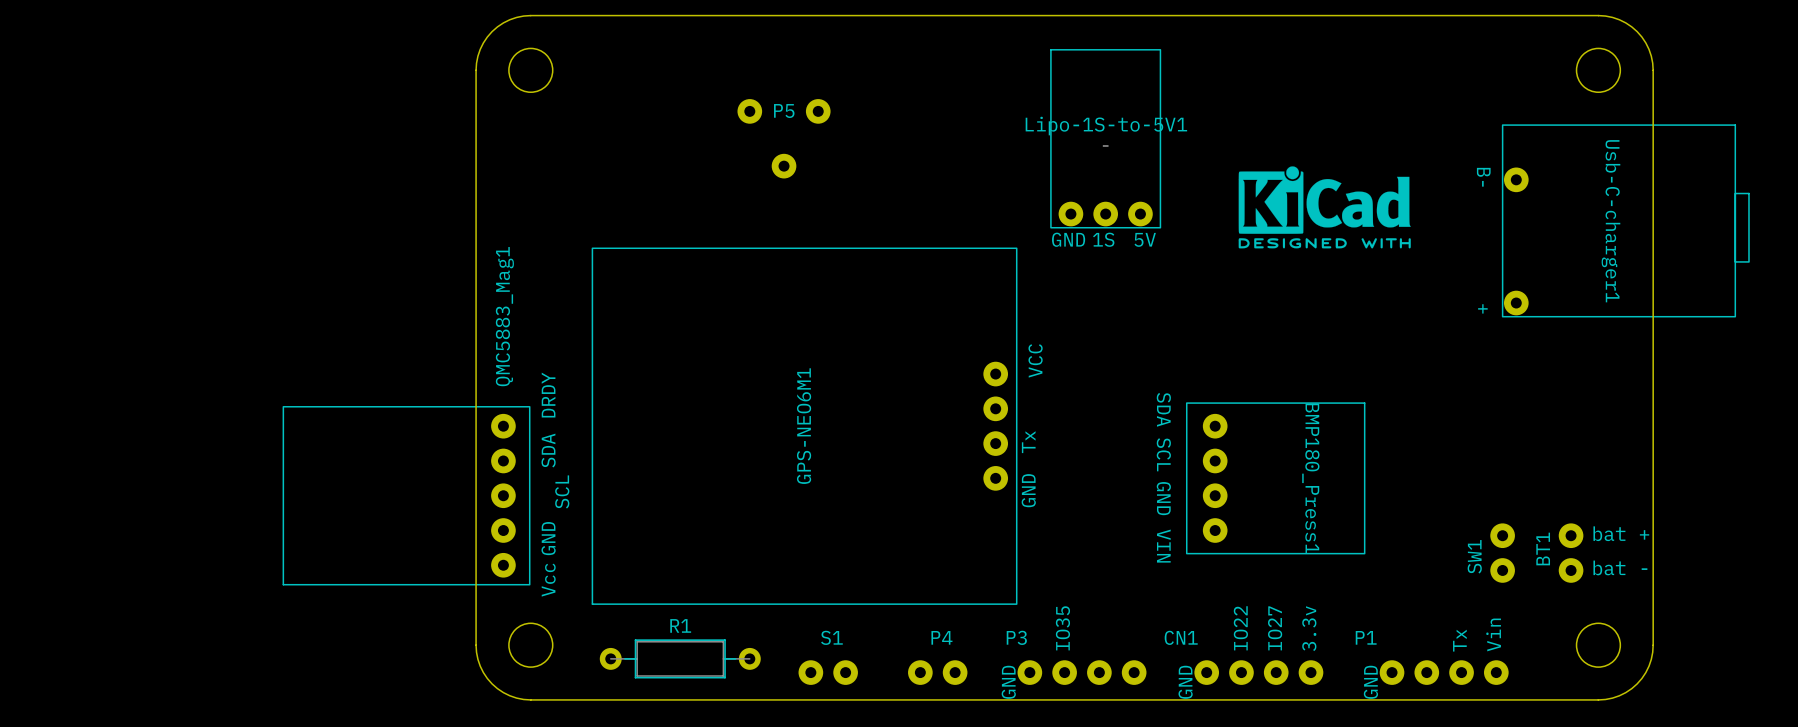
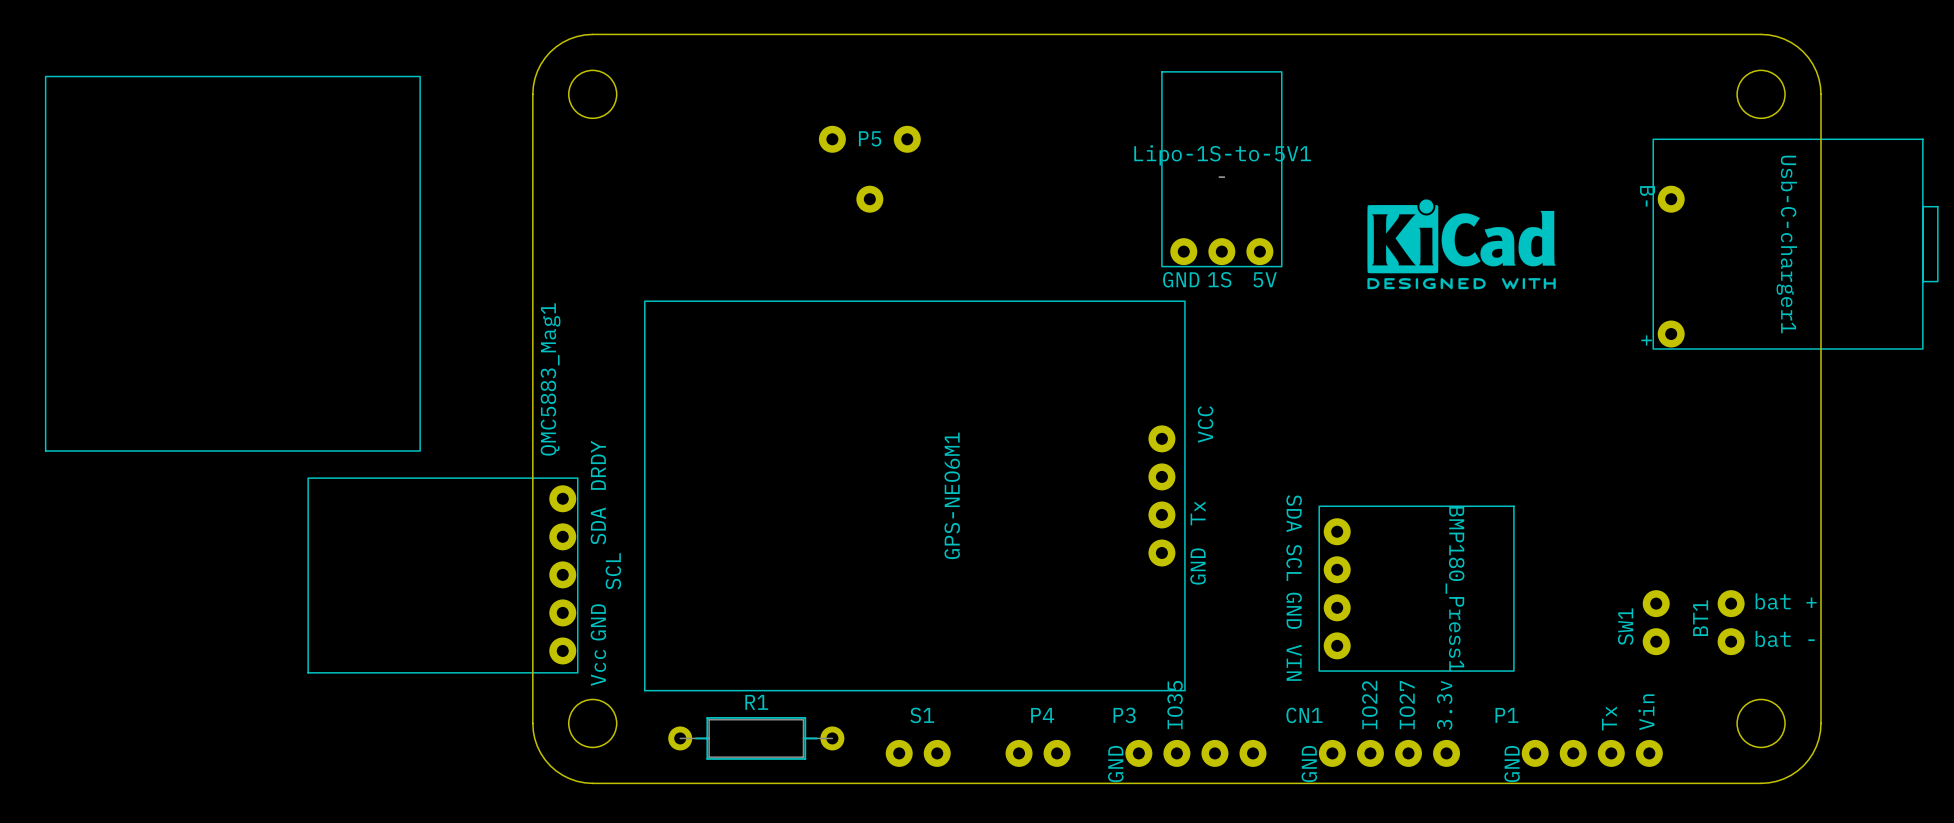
Usb-C-charger1 footprint: [1501, 124, 1750, 318] -> [1652, 138, 1939, 350]
GPS-NEO6M1 footprint: [591, 247, 1018, 605] -> [44, 75, 1186, 692]
BMP180_Press1 footprint: [1186, 402, 1366, 555] -> [1318, 505, 1515, 672]
QMC5883_Mag1 footprint: [282, 406, 531, 586] -> [307, 477, 579, 674]
GPS-NEO6M1 name position: GPS-NEO6M1 (804, 426) -> GPS-NEO6M1 (952, 495)

